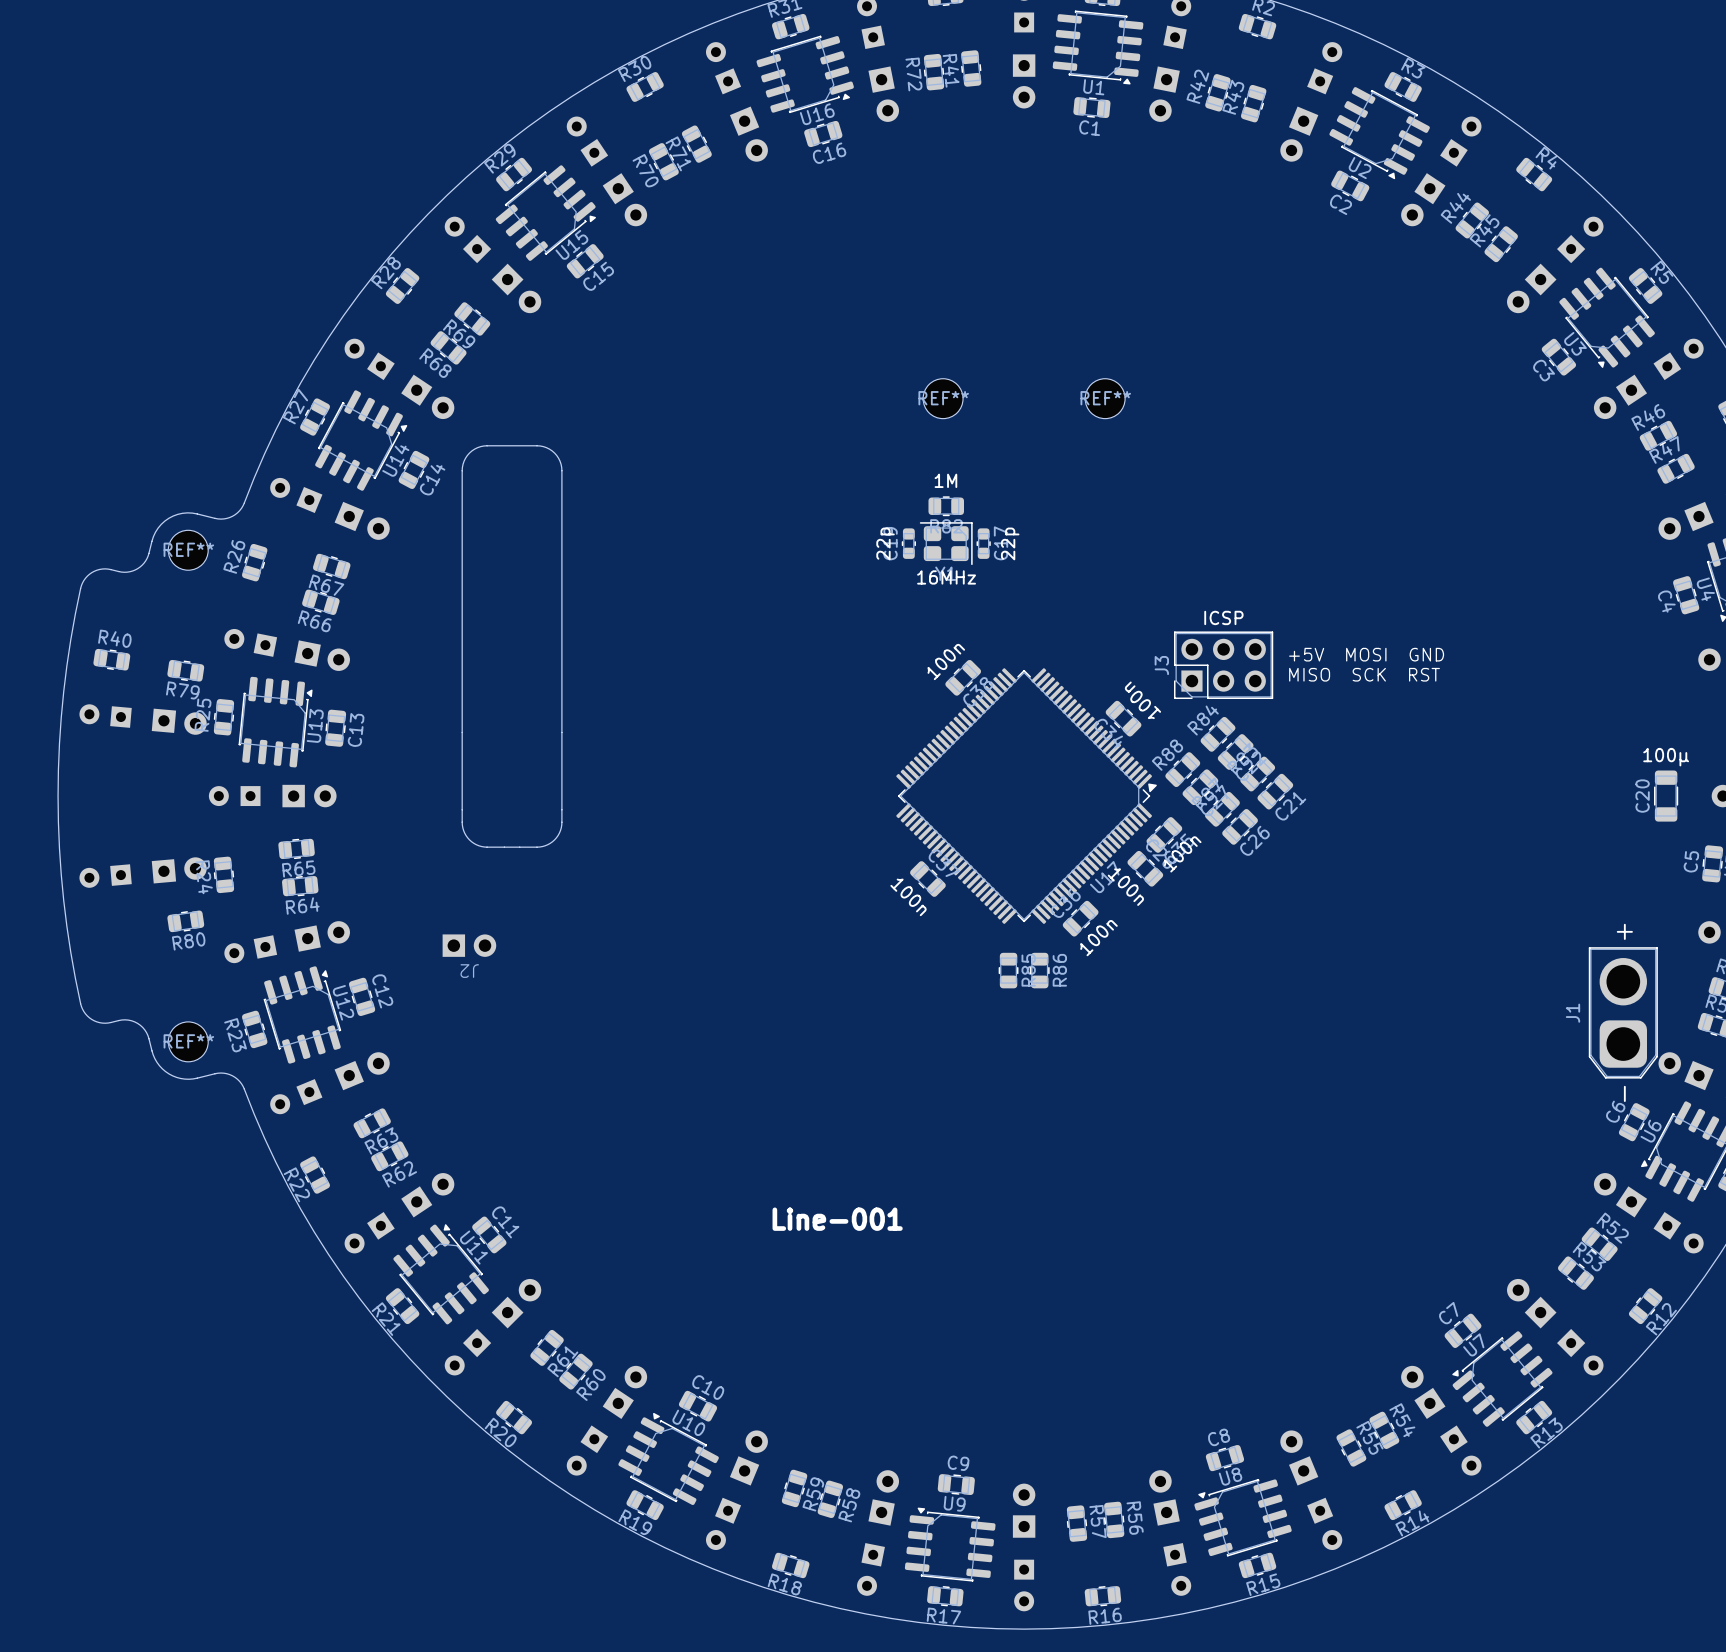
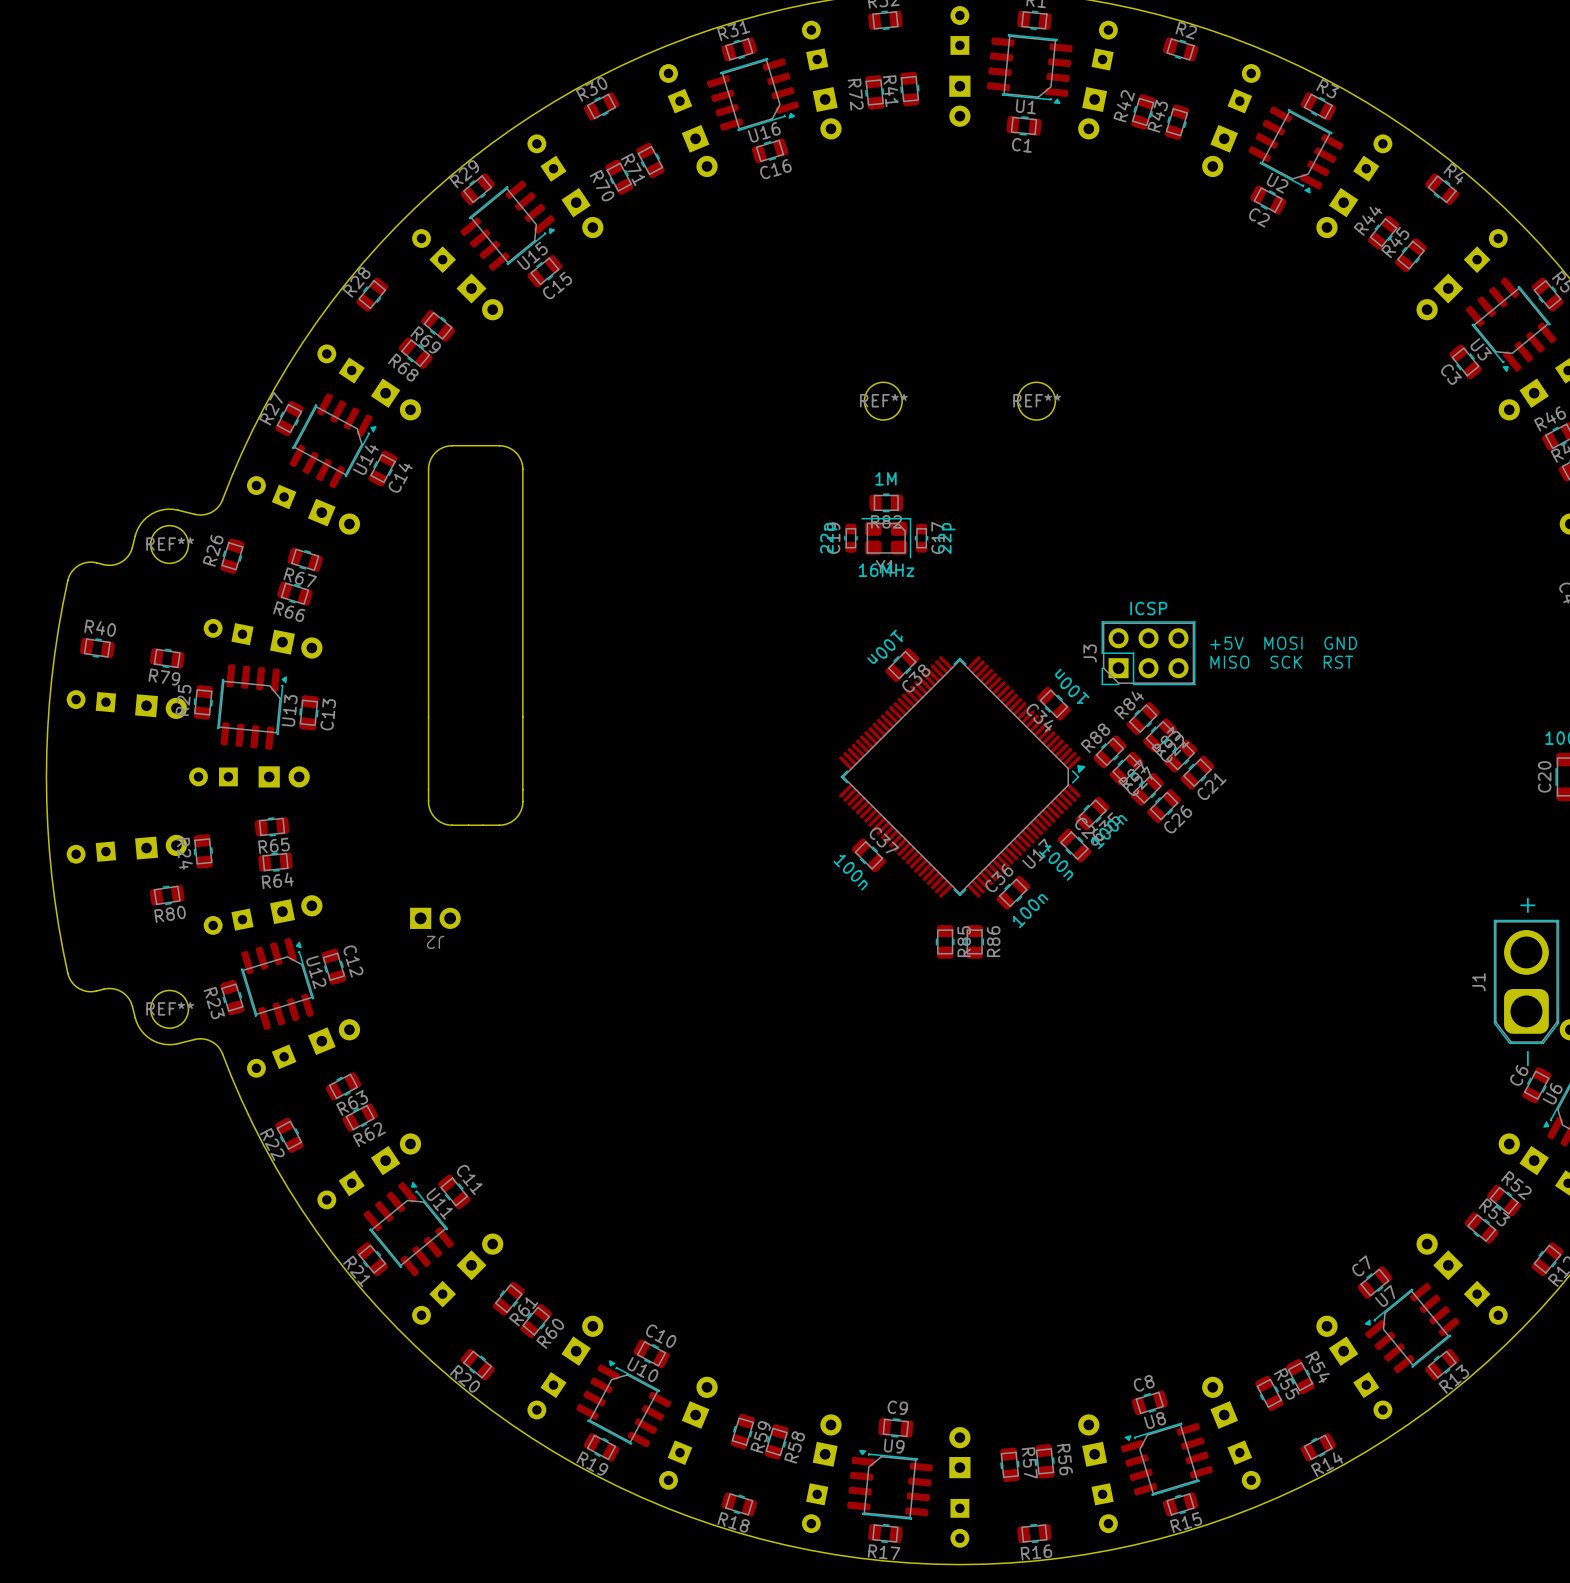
C38 value rotation: 0° (946, 661) -> 180° (884, 646)
text: Line-001 (837, 1219) -> none

